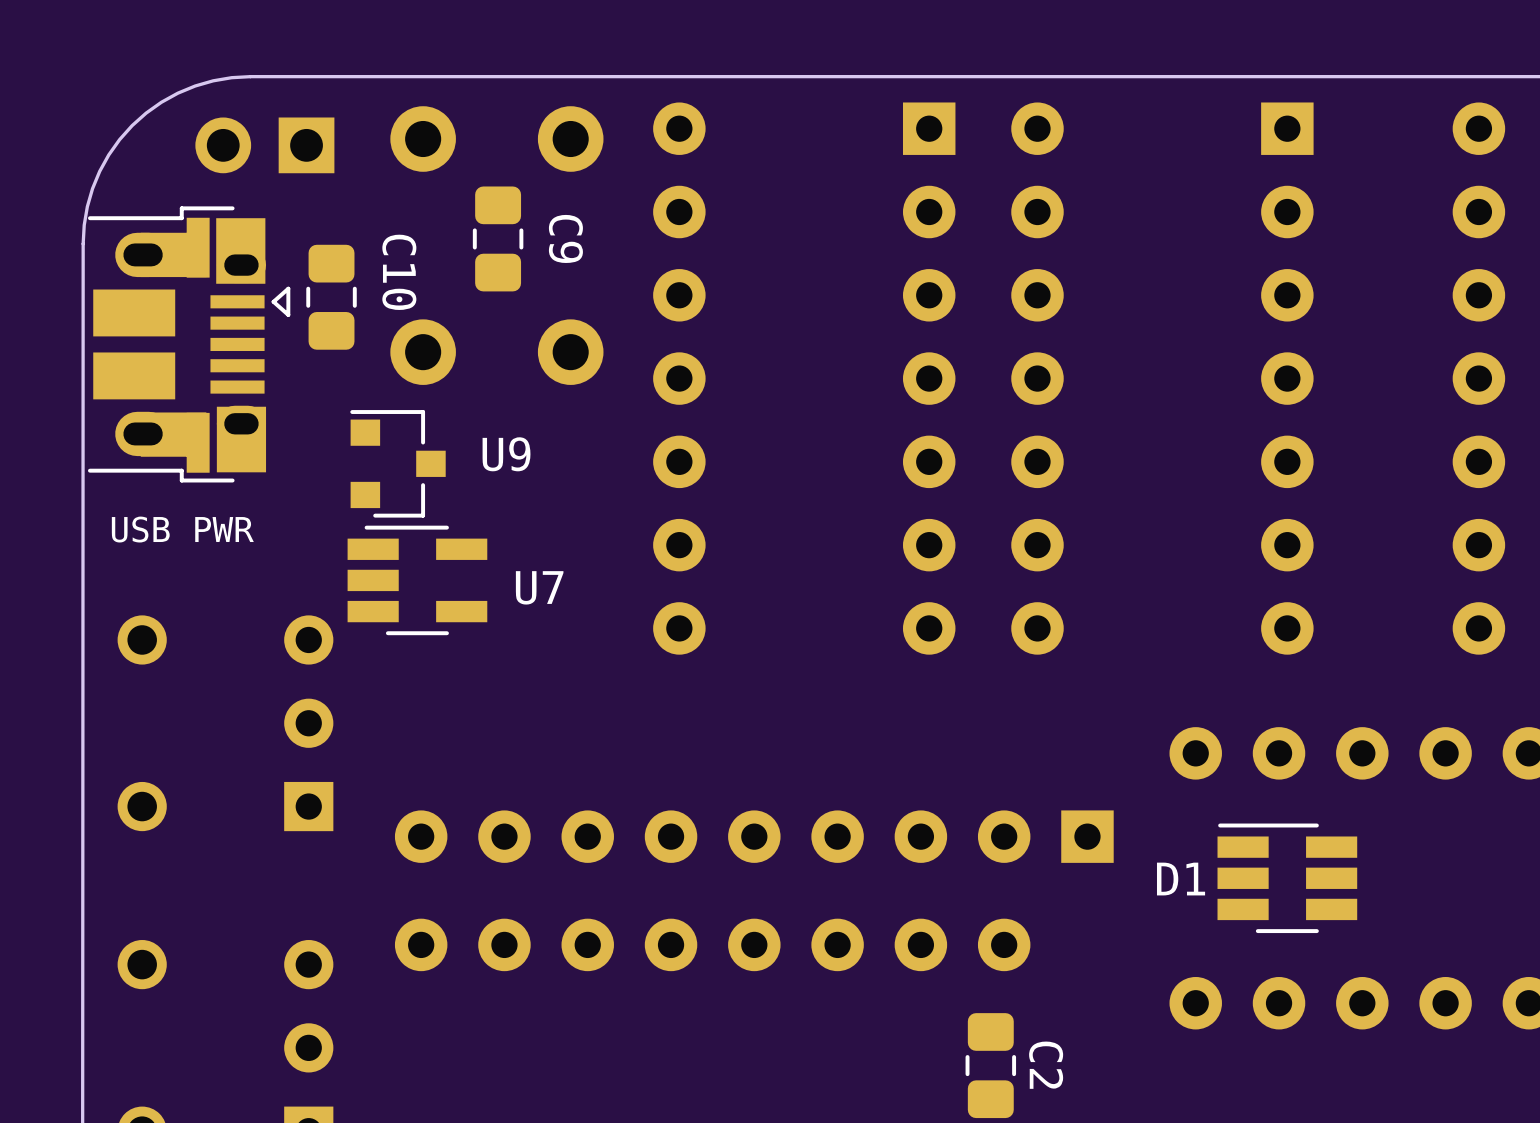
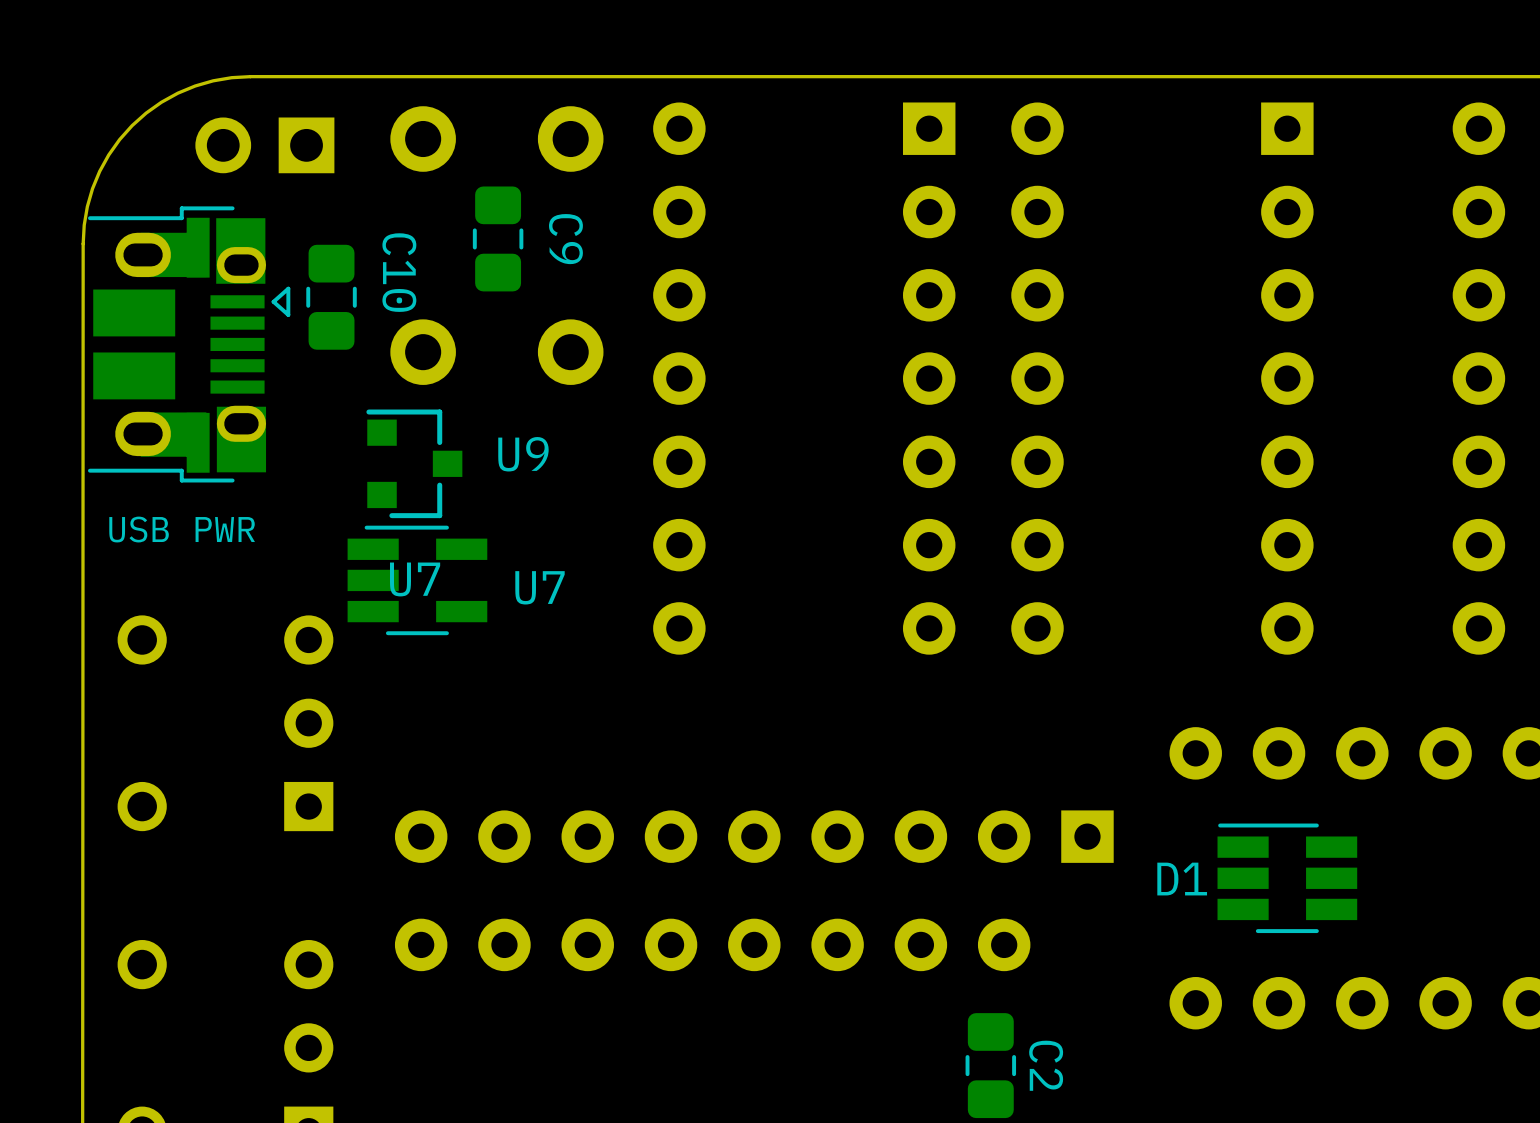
U9 footprint: [350, 410, 446, 518] -> [366, 409, 463, 519]
U9 name position: U9 (506, 454) -> U9 (523, 454)
drawing: none -> [389, 562, 441, 597]

